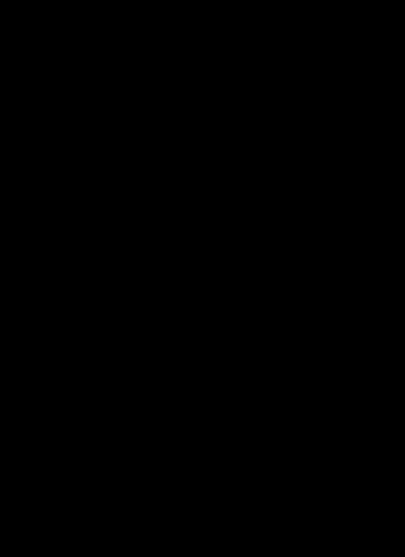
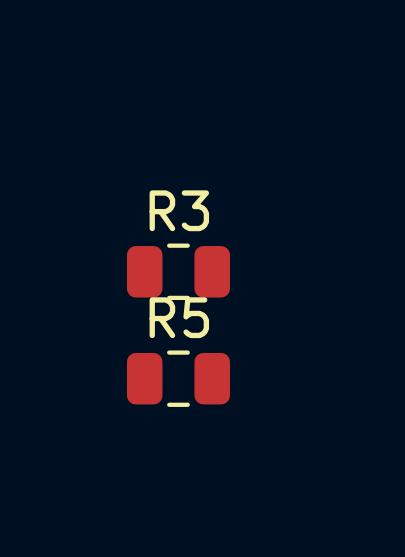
R3: none -> (178, 271)
R5: none -> (178, 378)

